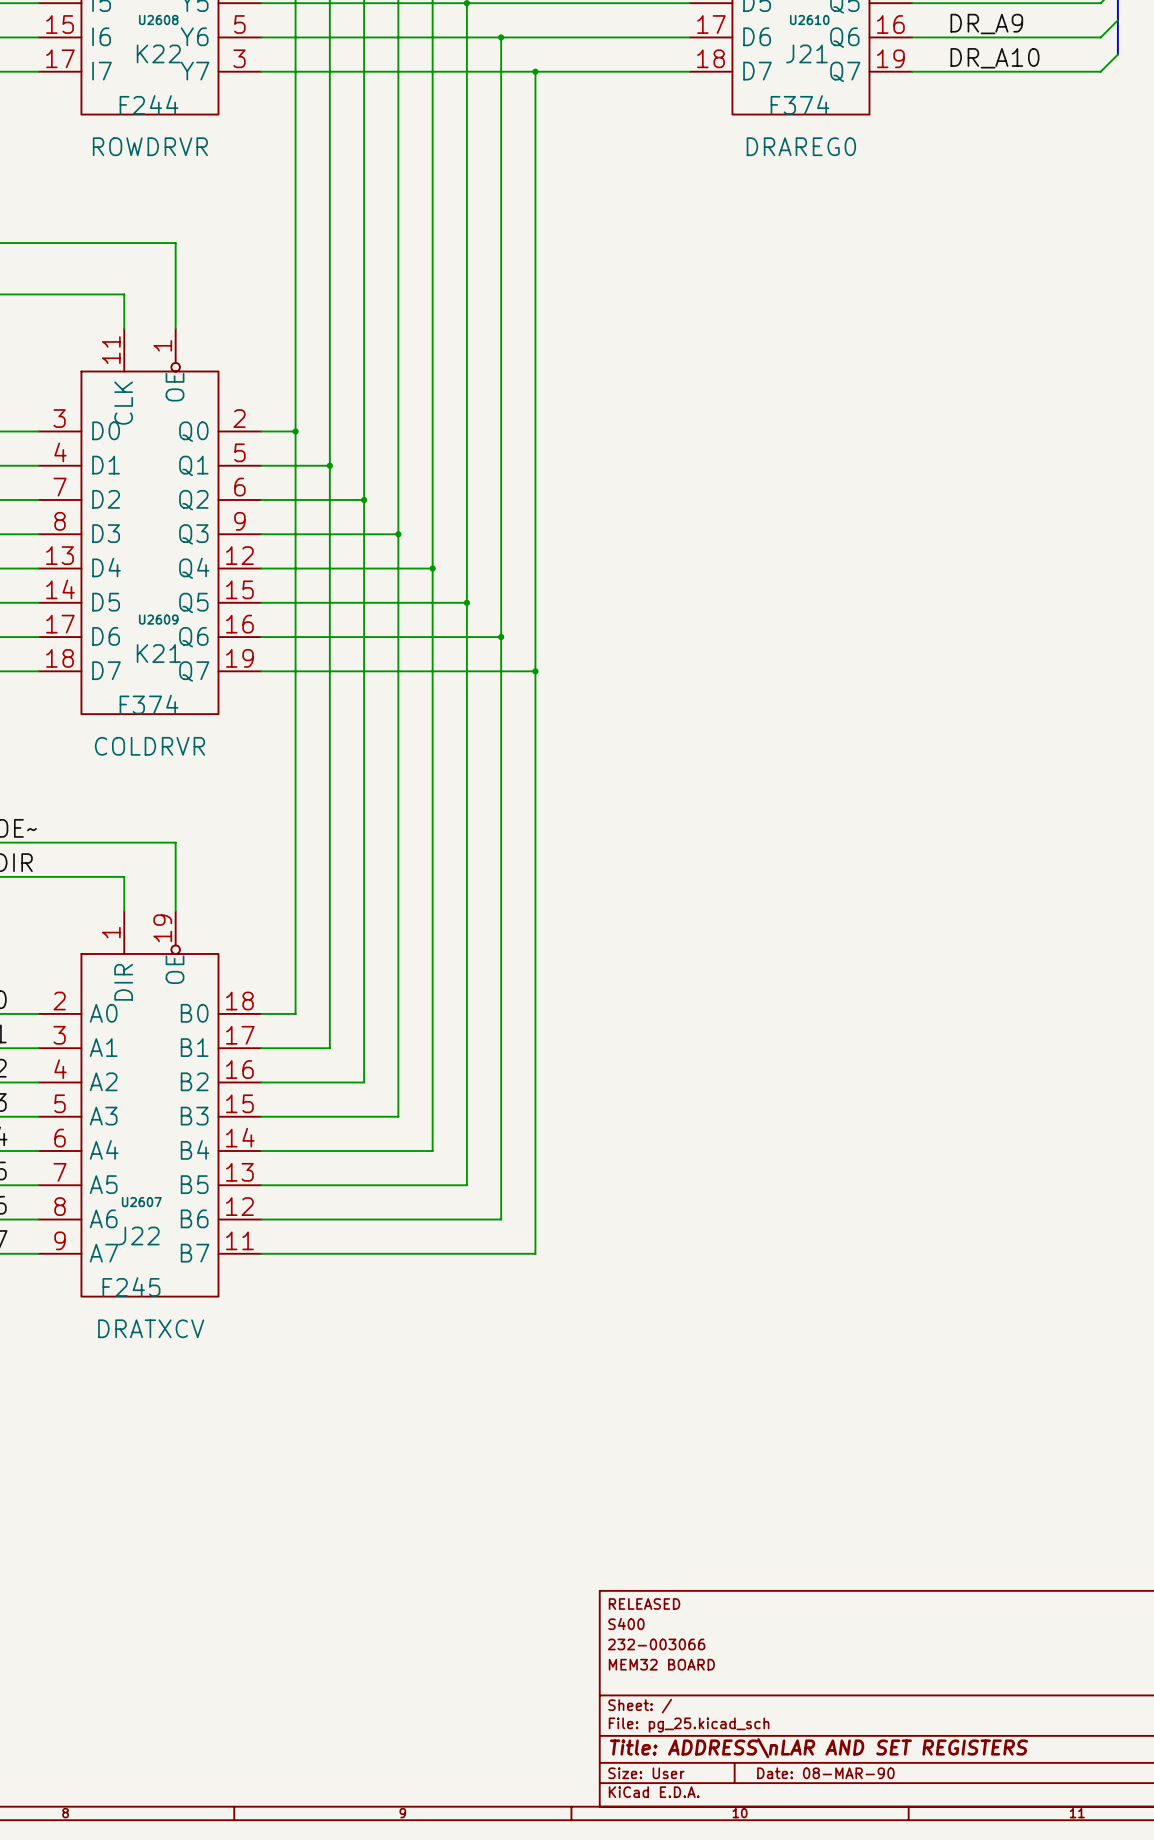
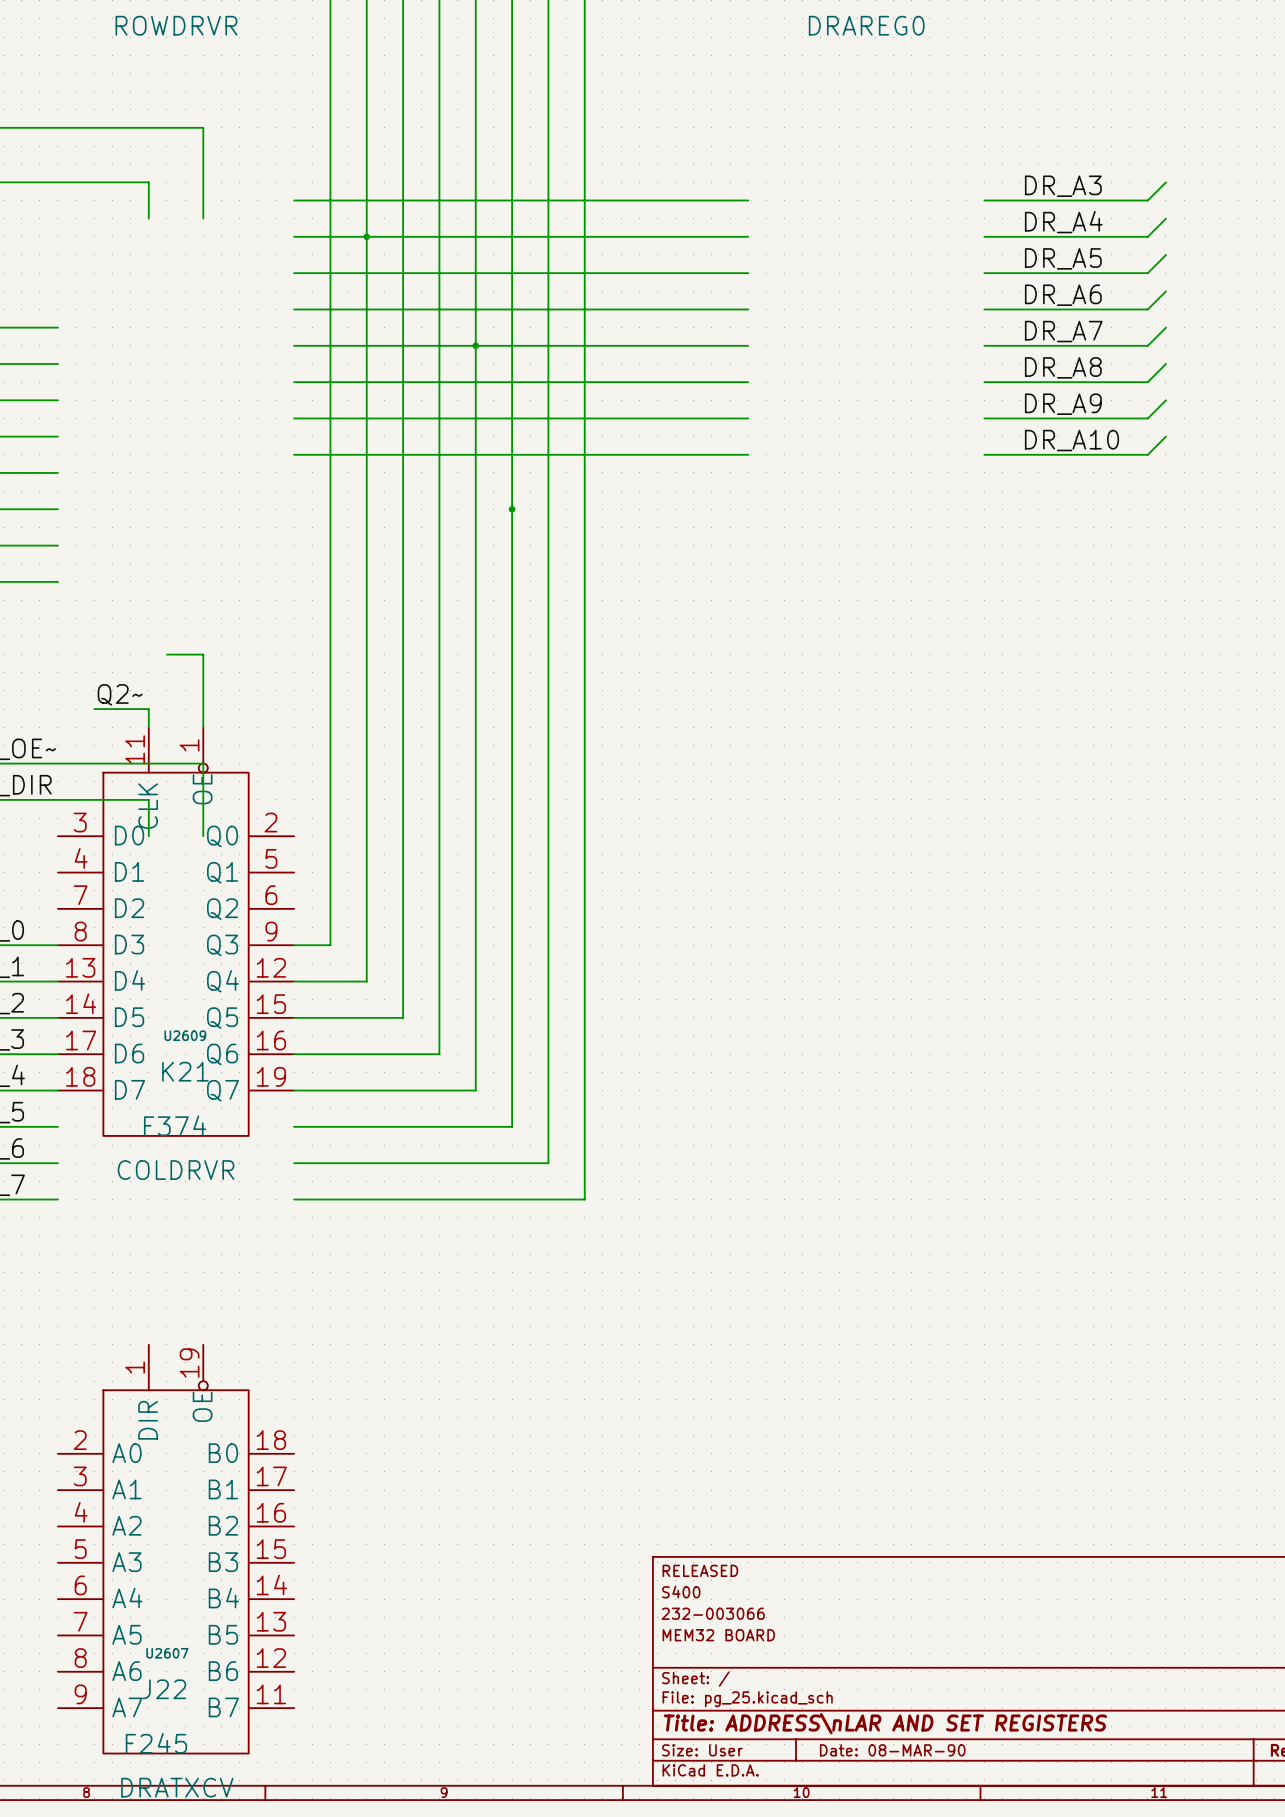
wire: none -> (1165, 182) (1147, 200) (984, 200)
label: none -> DR_A3 (1063, 186)
wire: none -> (294, 200) (748, 200)
wire: none -> (1165, 218) (1147, 236) (984, 236)
label: none -> DR_A4 (1063, 222)
wire: none -> (294, 236) (748, 236)
junction: none -> (366, 236)
wire: none -> (1165, 254) (1147, 273) (984, 273)
label: none -> DR_A5 (1063, 258)
wire: none -> (294, 273) (748, 273)
wire: none -> (1165, 291) (1147, 309) (984, 309)
label: none -> DR_A6 (1063, 295)
wire: none -> (294, 309) (748, 309)
wire: (261, 431) (295, 431) -> none
junction: (295, 431) -> none
wire: none -> (1165, 327) (1147, 345) (984, 345)
label: none -> DR_A7 (1063, 331)
wire: none -> (294, 345) (748, 345)
junction: none -> (475, 345)
wire: (261, 465) (329, 465) -> none
junction: (329, 465) -> none
wire: none -> (1165, 363) (1147, 382) (984, 382)
label: none -> DR_A8 (1063, 367)
wire: none -> (294, 382) (748, 382)
wire: (261, 500) (364, 500) -> none
junction: (364, 500) -> none
wire: none -> (1165, 400) (1147, 418) (984, 418)
label: none -> DR_A9 (1063, 404)
wire: none -> (294, 418) (748, 418)
U2609 position: (149, 521) -> (176, 931)
wire: (261, 534) (398, 534) -> none
junction: (398, 534) -> none
wire: none -> (1165, 436) (1147, 454) (984, 454)
label: none -> DR_A10 (1071, 440)
wire: none -> (294, 454) (748, 454)
wire: (261, 568) (432, 568) -> none
junction: (432, 568) -> none
wire: (261, 602) (466, 602) -> none
wire: (261, 637) (501, 637) -> none
junction: (501, 637) -> none
wire: (261, 671) (535, 671) -> none
junction: (535, 671) -> none
wire: none -> (166, 654) (203, 654) (203, 727)
label: none -> Q2~ (120, 694)
wire: none -> (94, 709) (148, 709) (148, 727)
U2607 position: (149, 1103) -> (176, 1549)

